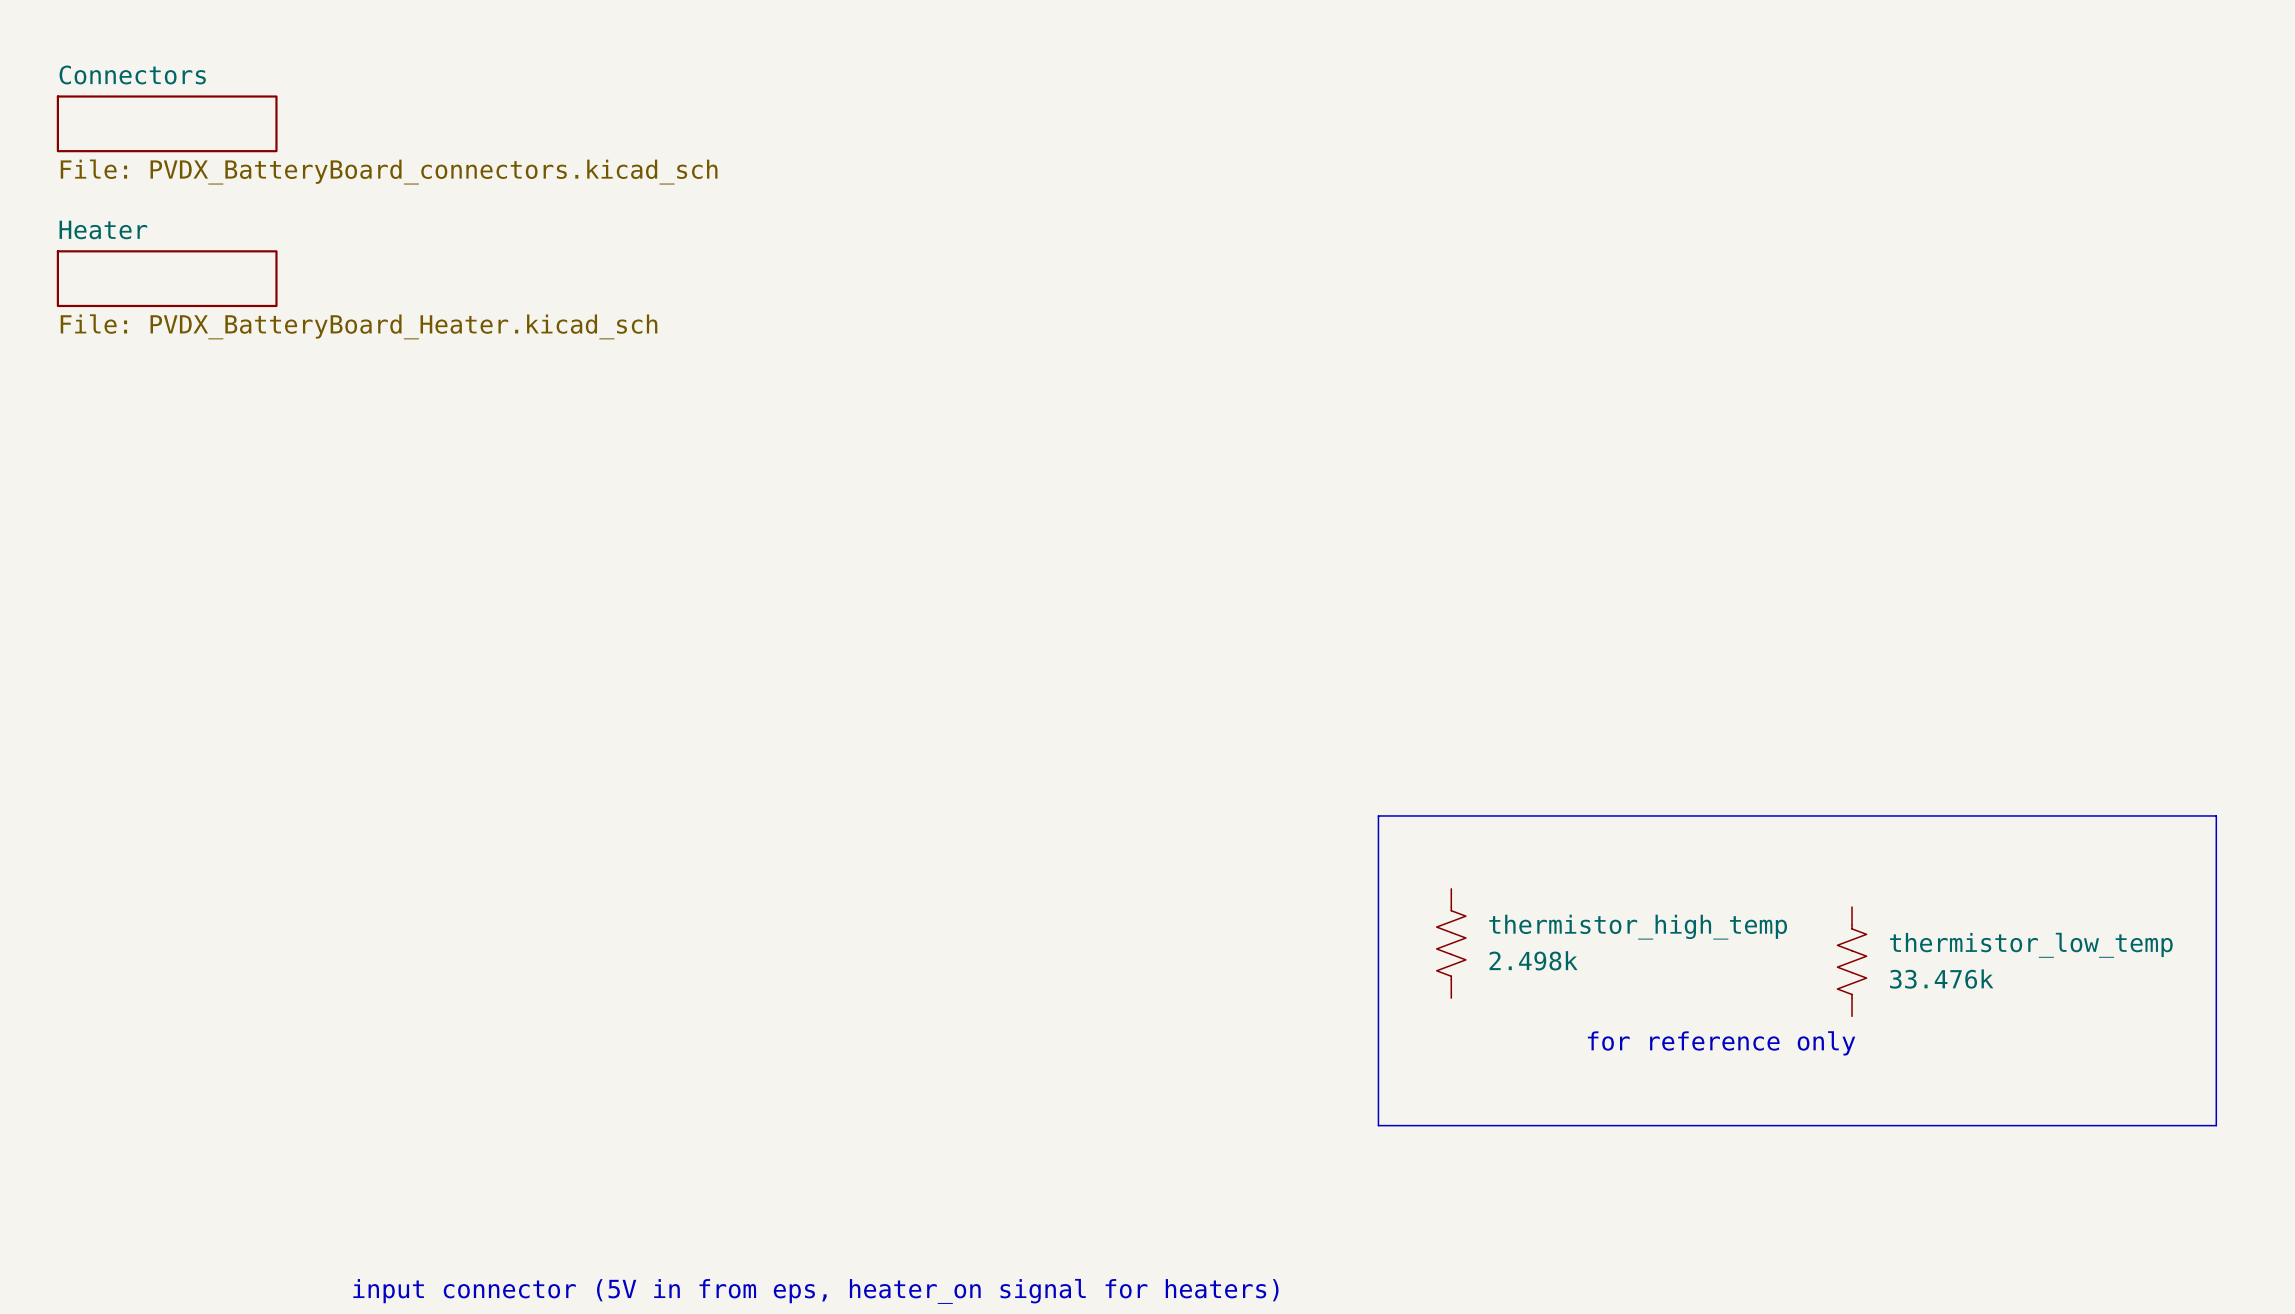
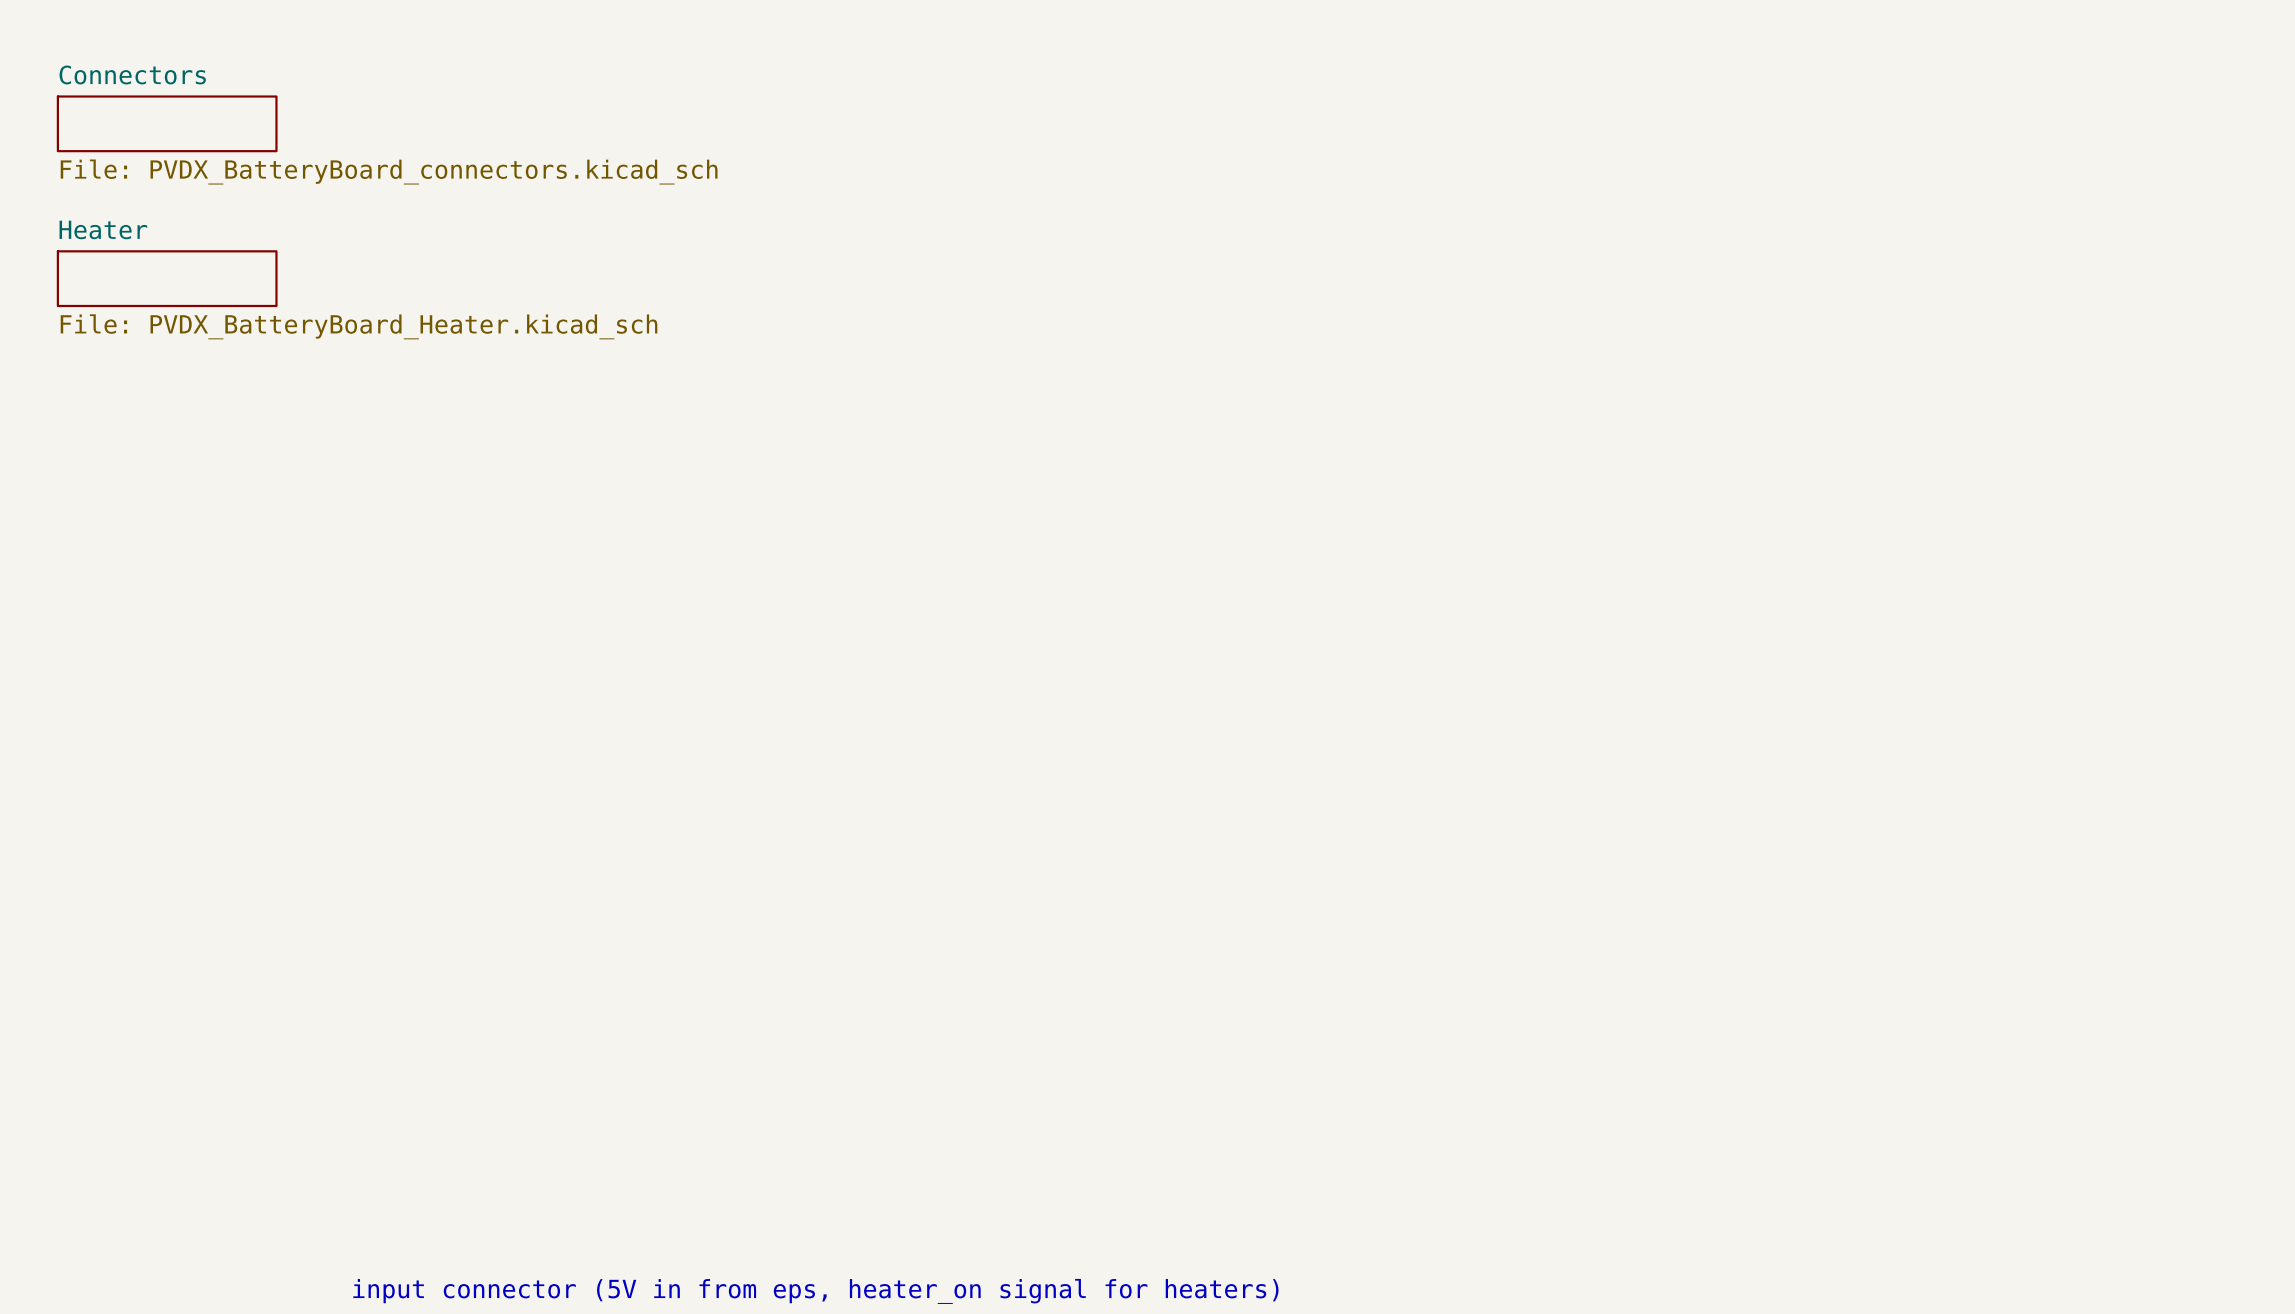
line: (1378, 815) (2216, 815) (2216, 1125) (1378, 1125) (1378, 815) -> none
thermistor_high_temp: 2.498k (1451, 943) -> none
thermistor_low_temp: 33.476k (1852, 961) -> none
text: for reference only (1721, 1043) -> none

